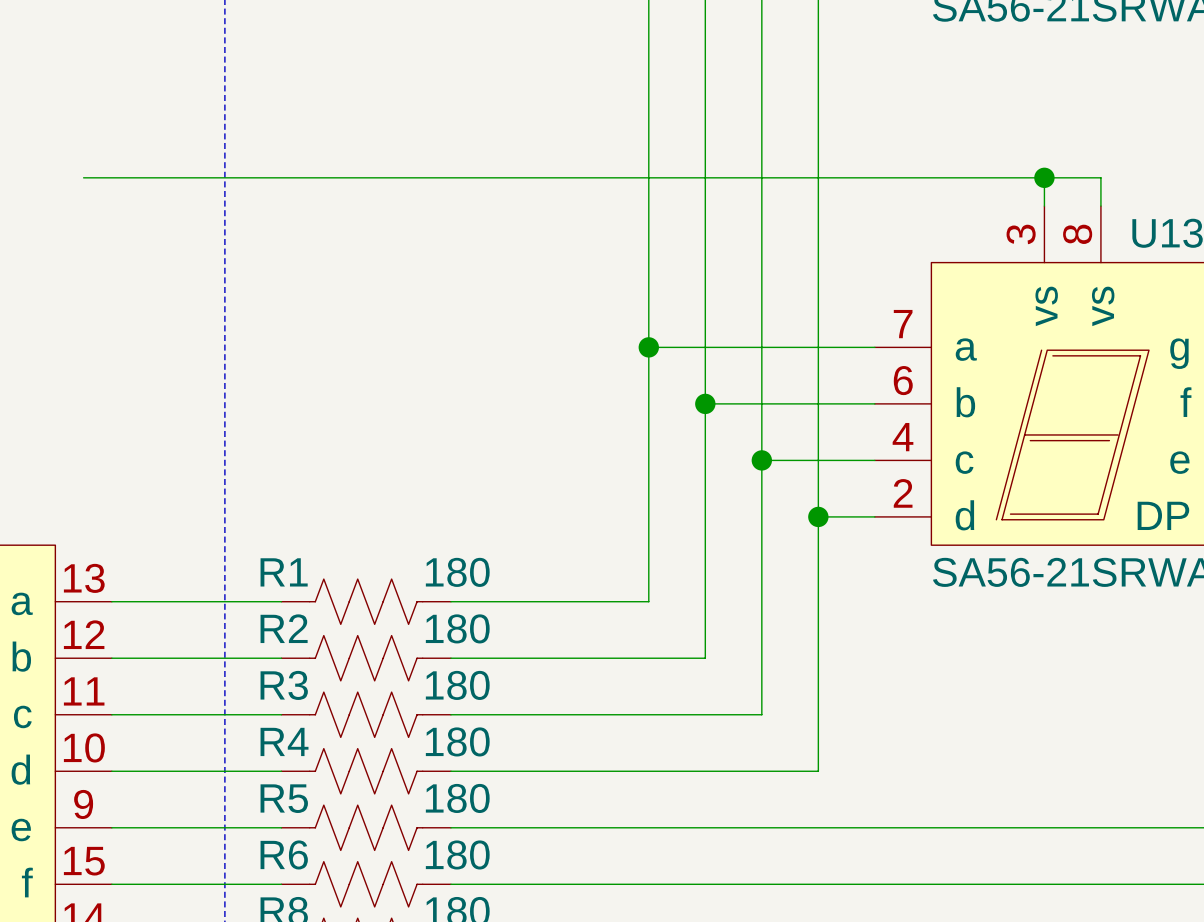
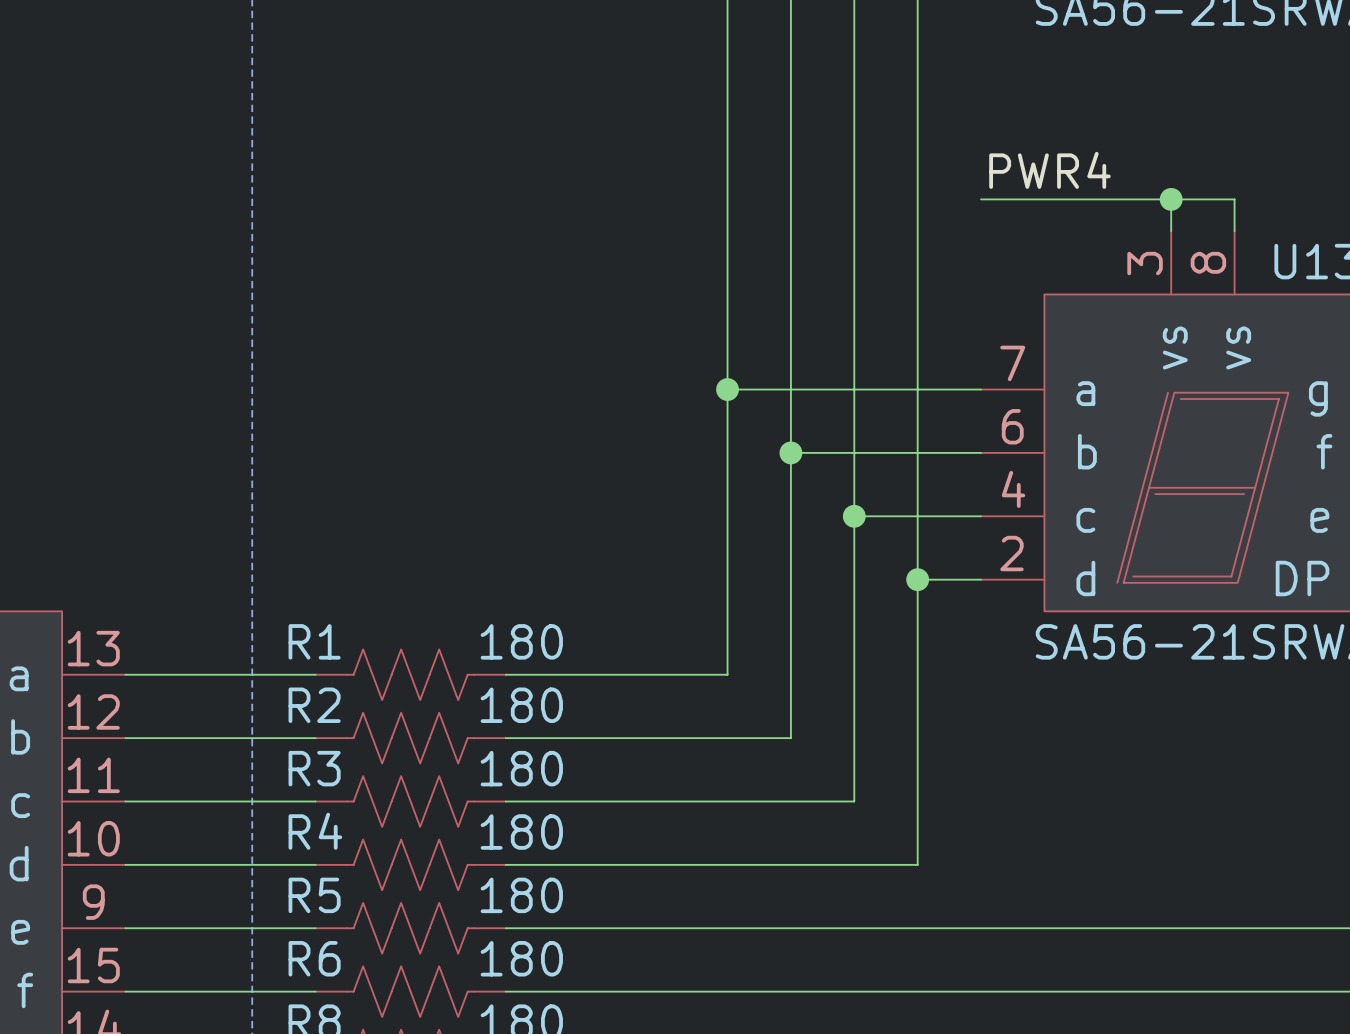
label: none -> PWR4 (1049, 170)
wire: (83, 177) (874, 177) -> none

